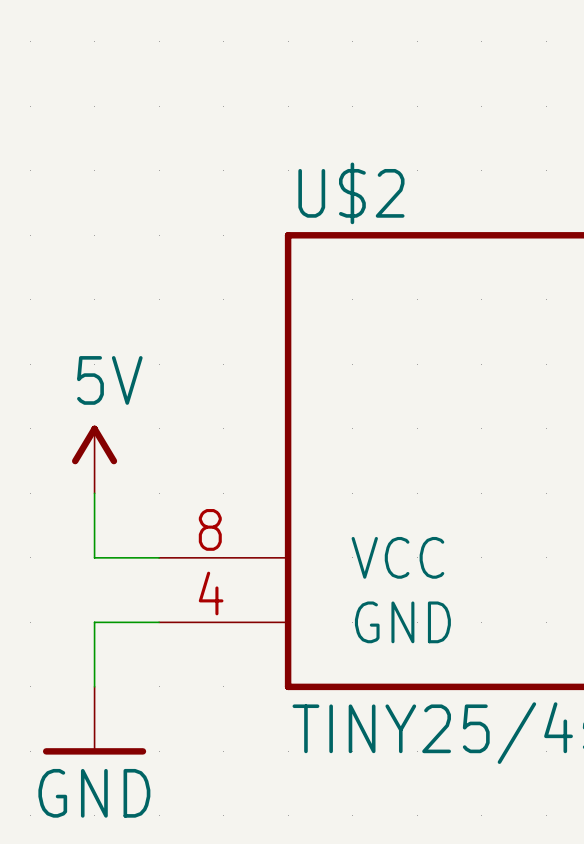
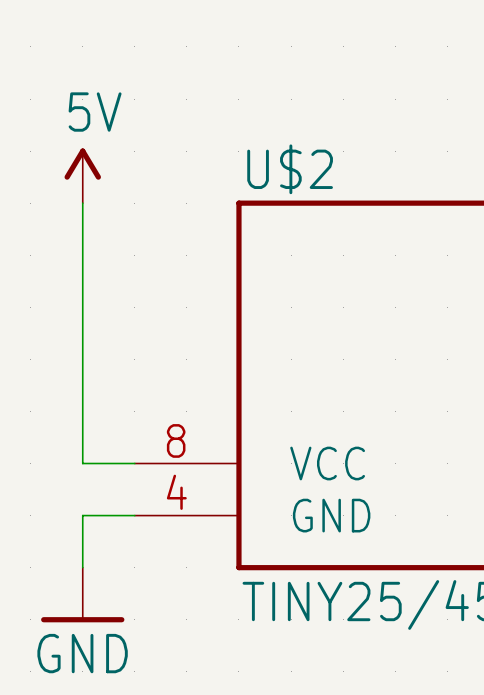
wire: none -> (82, 203) (82, 411)
power symbol position: 5V (94, 459) -> 5V (82, 175)

